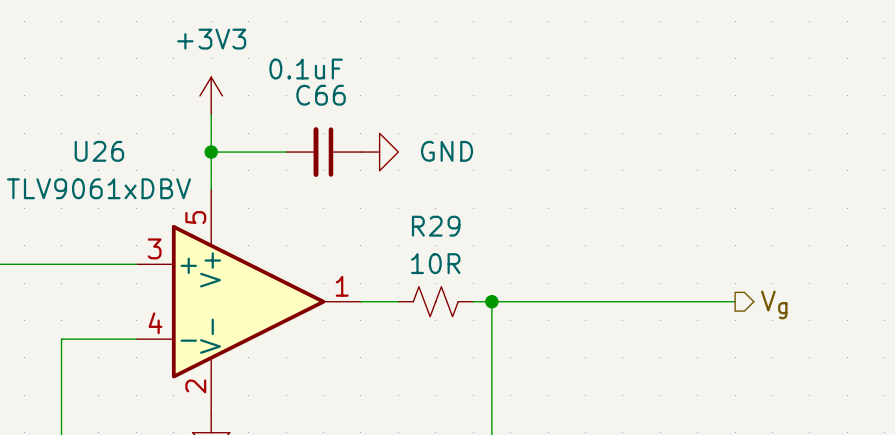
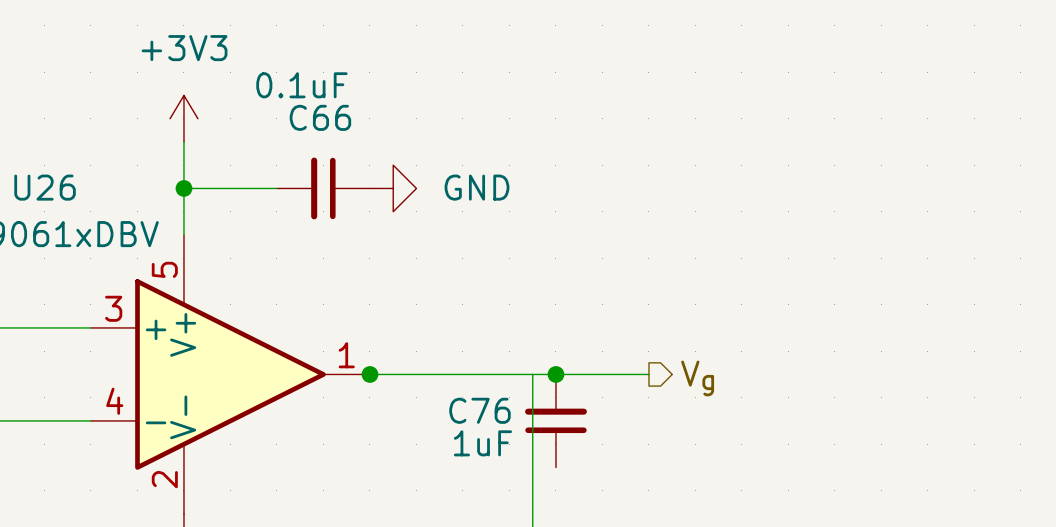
junction: none -> (369, 374)
wire: none -> (416, 374) (509, 374)
R29: 10R (435, 301) -> none
junction position: (491, 301) -> (555, 374)
wire: (585, 301) (735, 301) -> none
hierarchical label position: Vg (774, 304) -> Vg (697, 378)
C76: none -> 1uF (555, 420)

